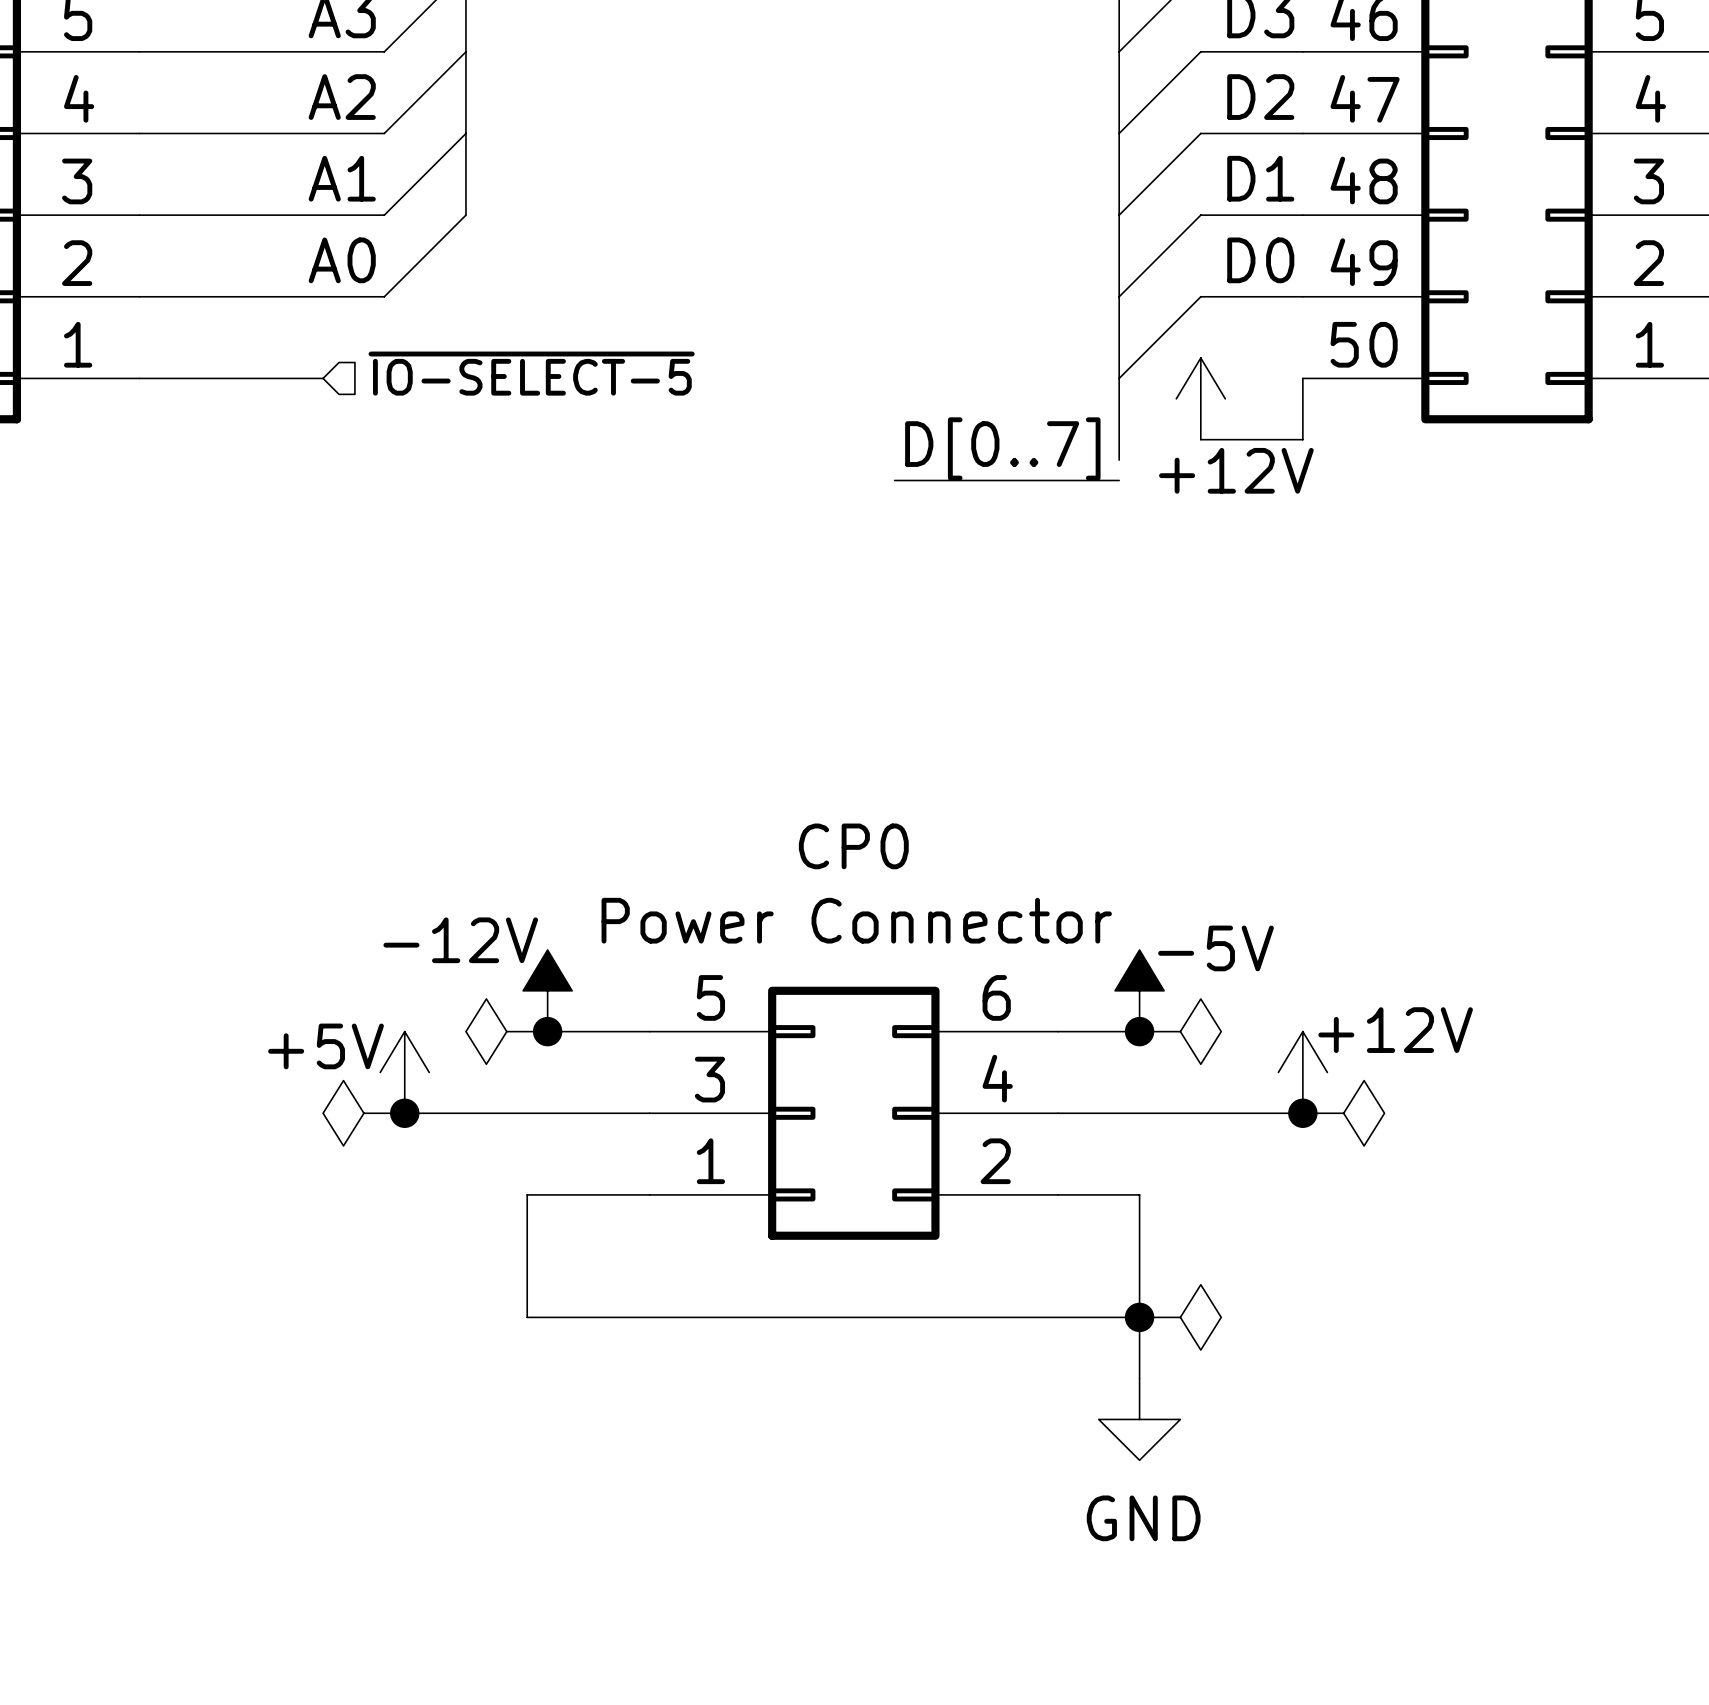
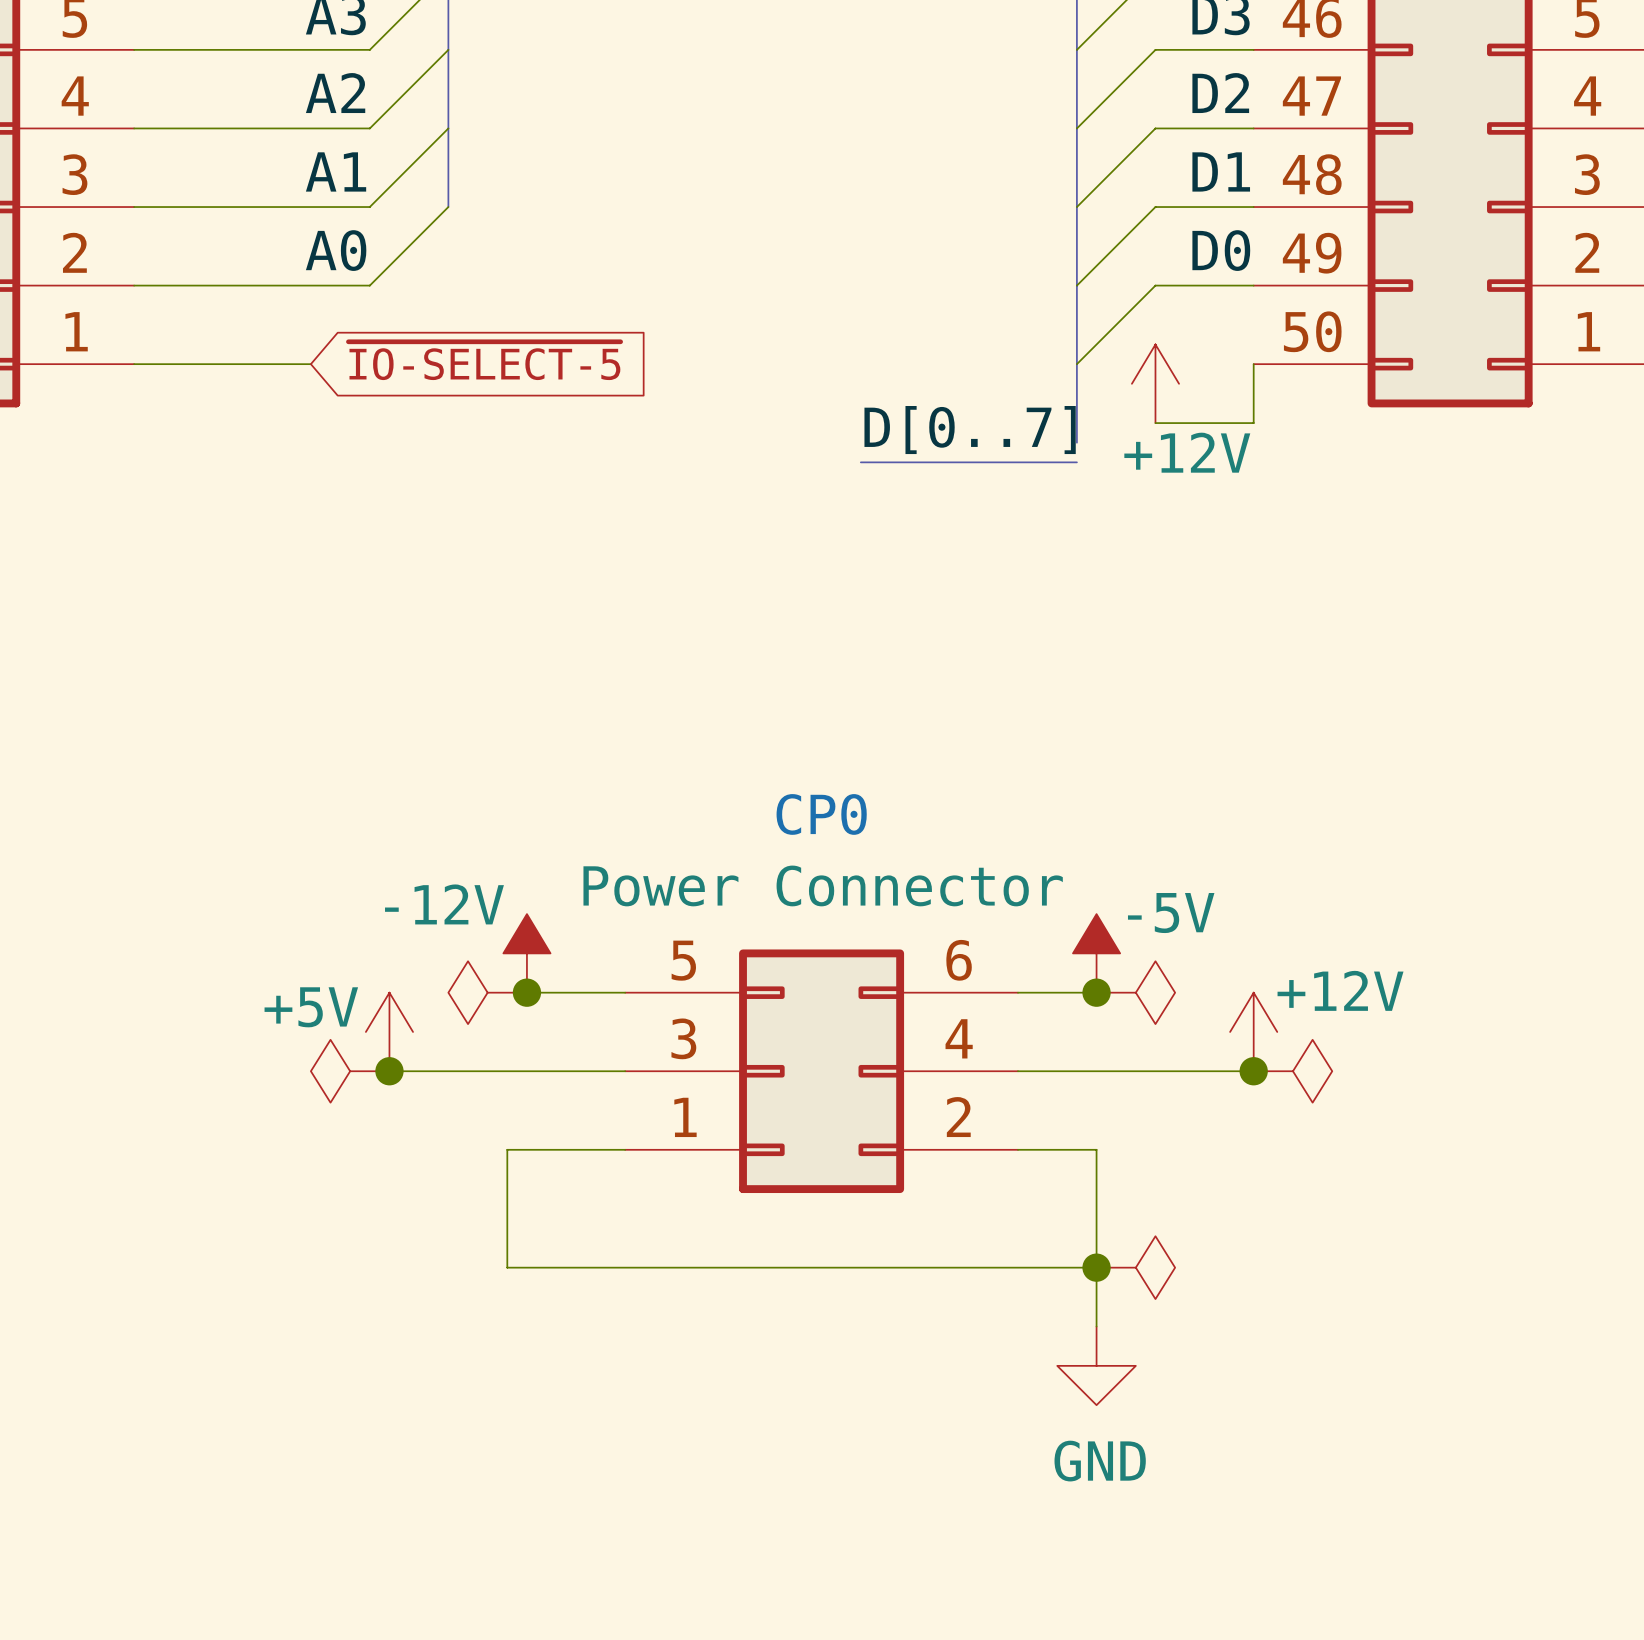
hierarchical label: ~{IO-SELECT-5} (531, 373) -> none
global label: none -> ~{IO-SELECT-5} (484, 360)

